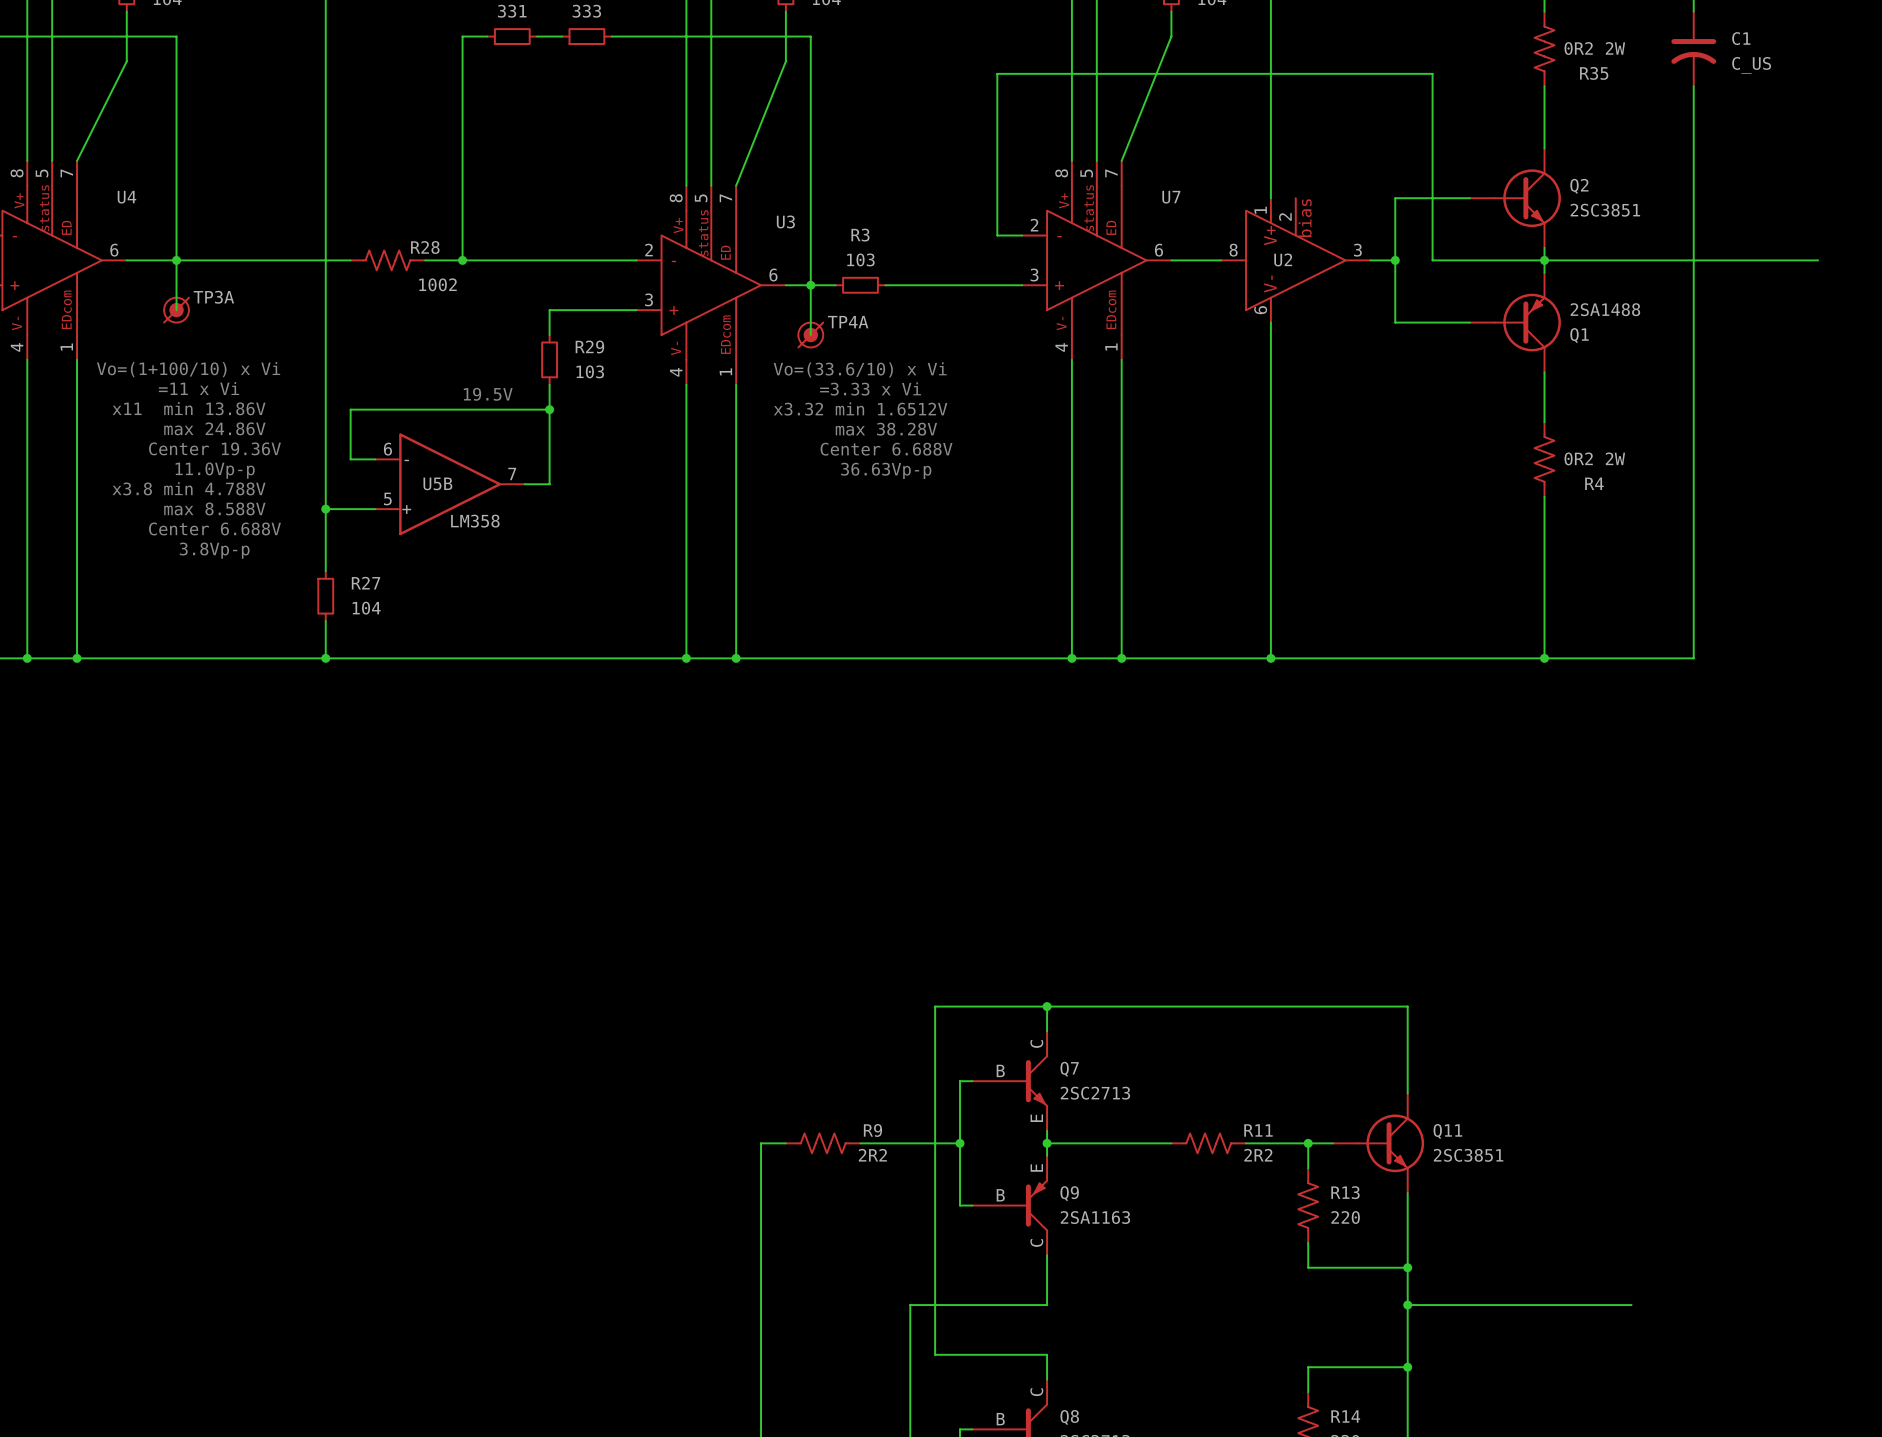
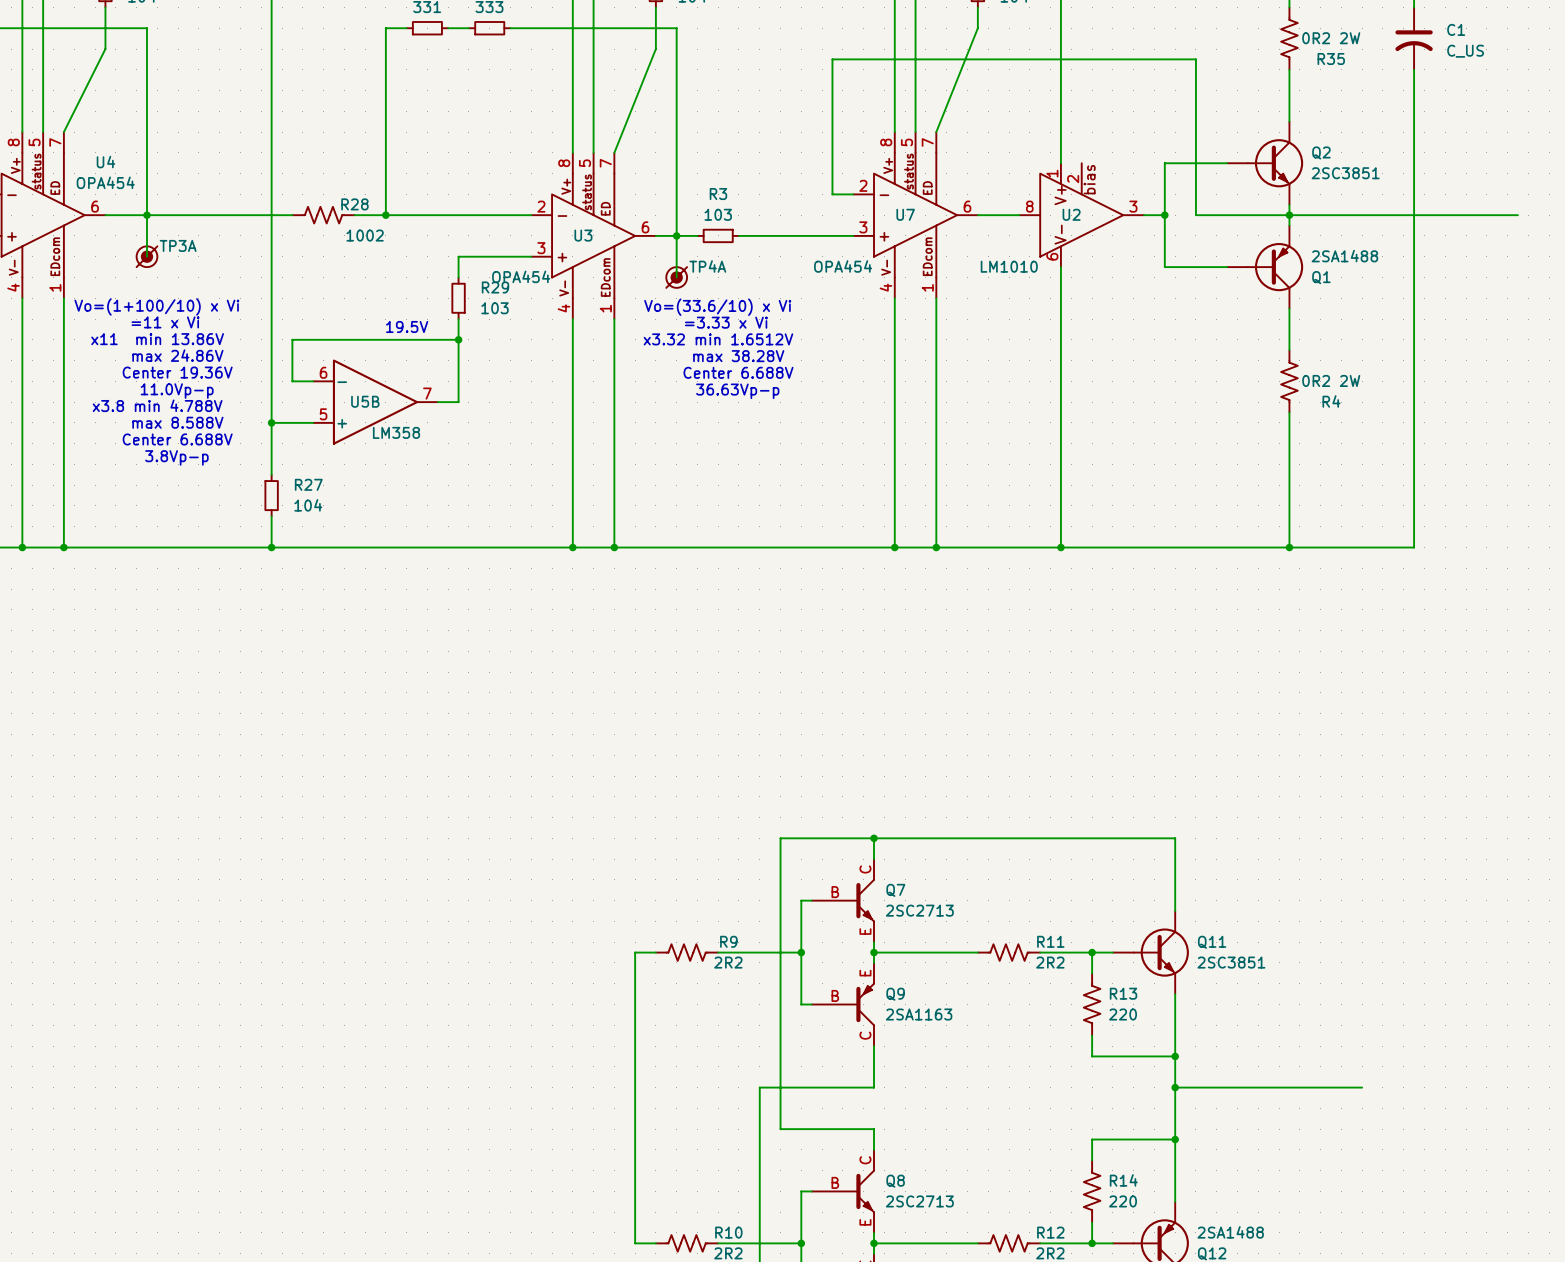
U7 name position: U7 (1171, 197) -> U7 (905, 214)
U4 value: none -> OPA454 (105, 182)
U3 name position: U3 (785, 221) -> U3 (583, 235)
U7 value: none -> OPA454 (843, 266)
U2 value: none -> LM1010 (1009, 266)
U3 value: none -> OPA454 (521, 276)

